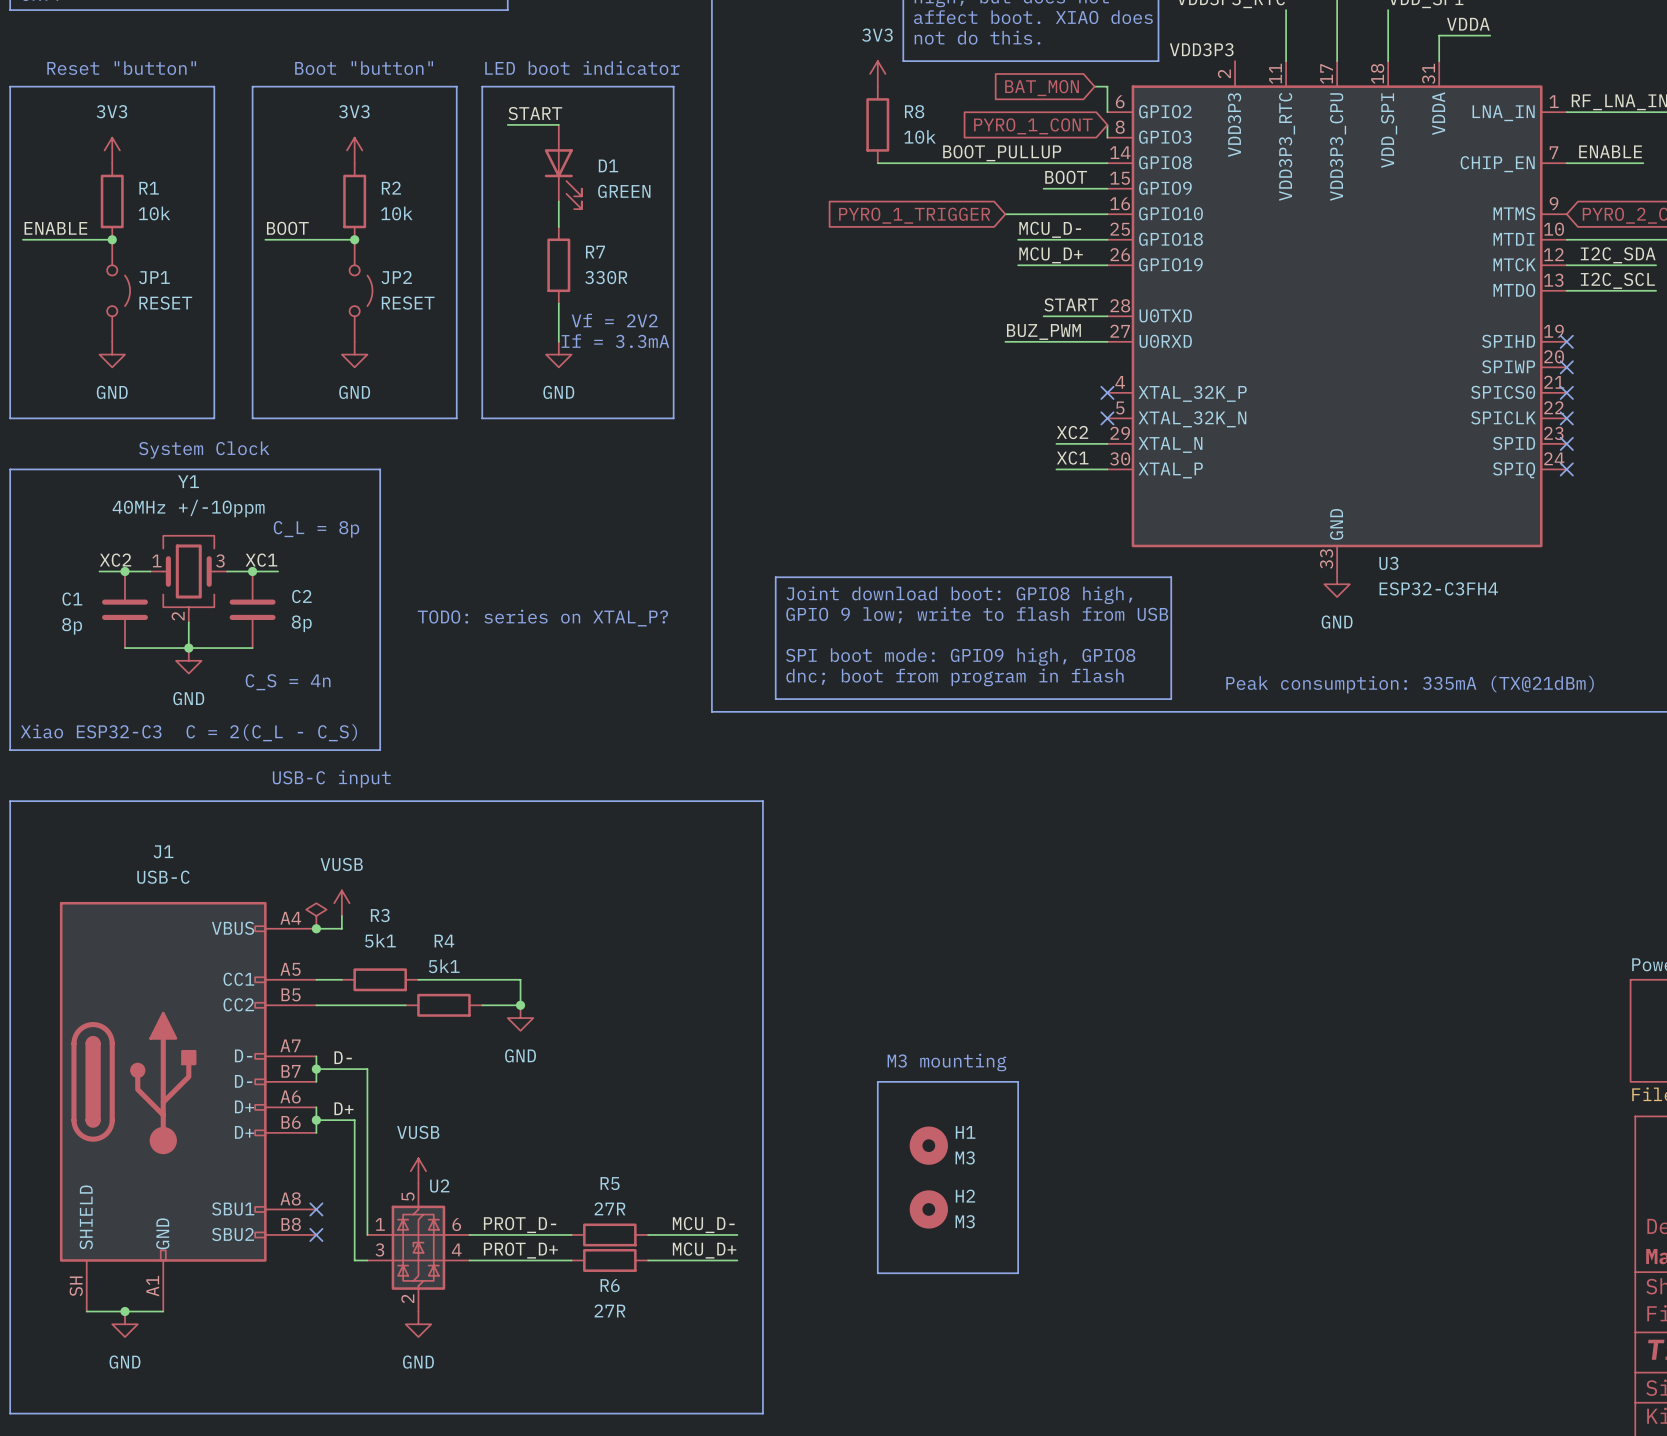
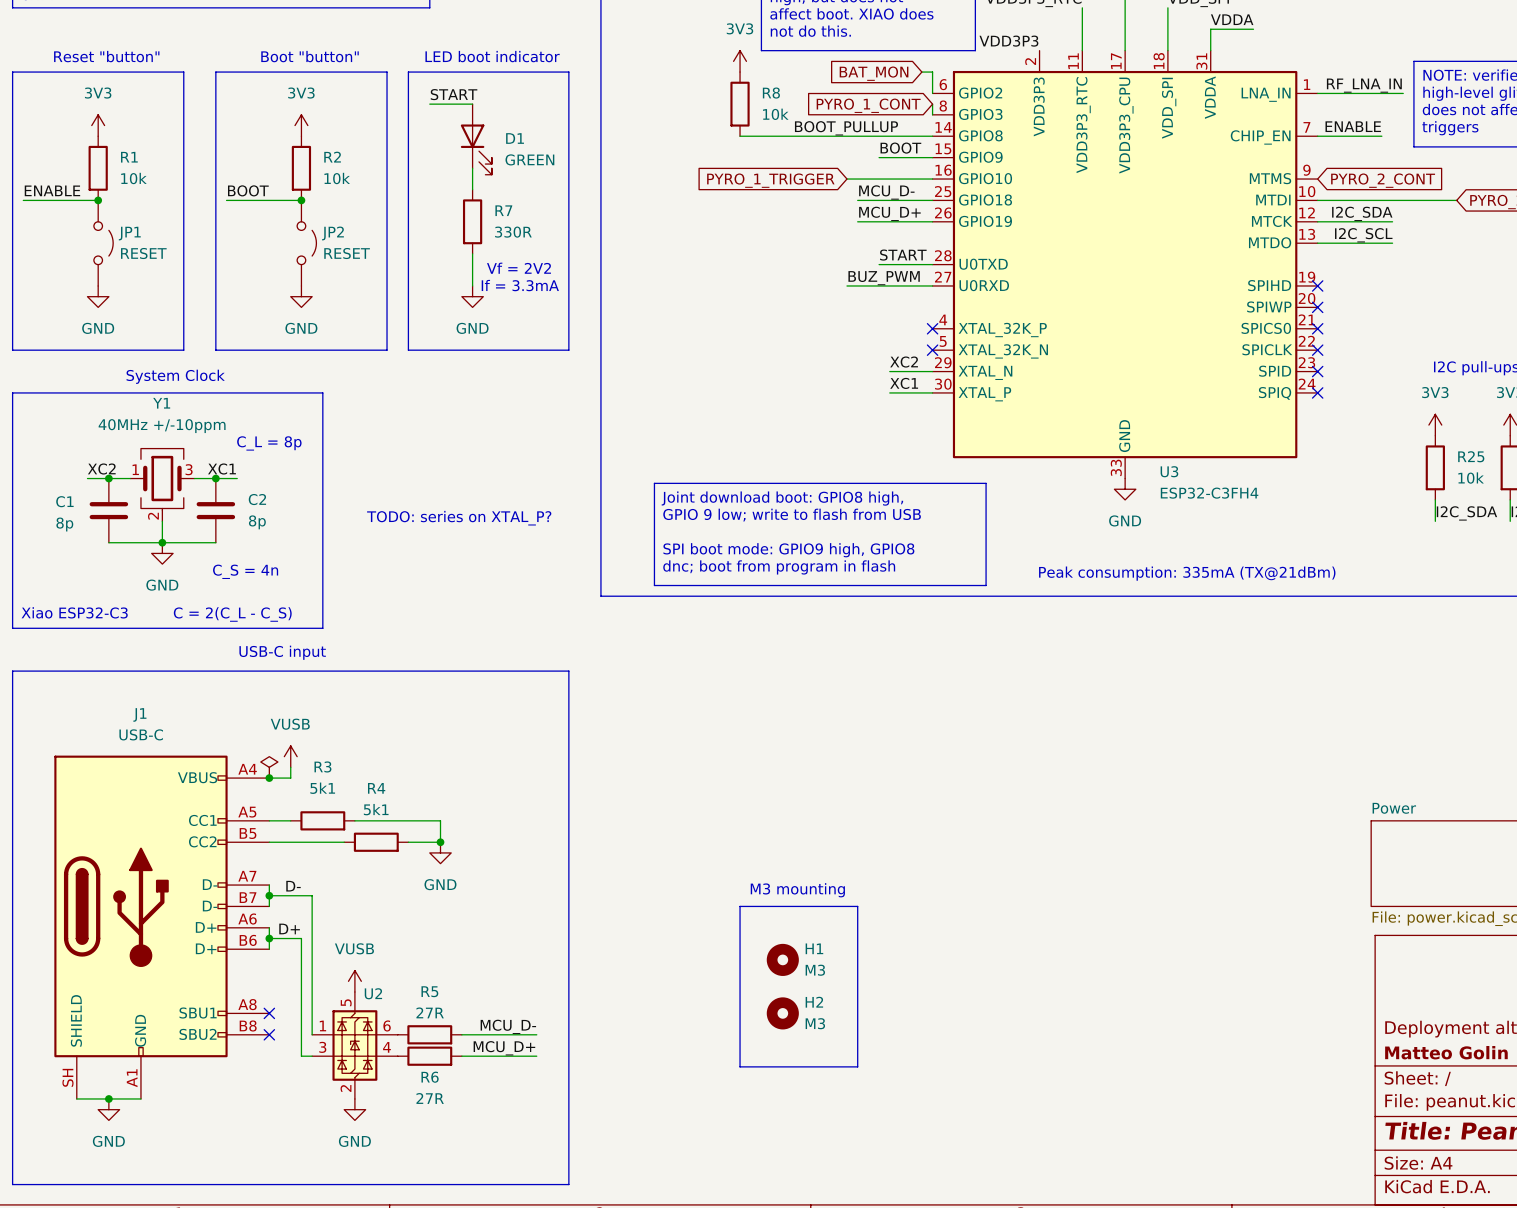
line: (673, 801) (762, 801) (762, 1413) (673, 1413) -> (568, 671) (568, 1184)
label: PROT_D- (520, 1225) -> none
label position: MCU_D- (703, 1225) -> MCU_D- (508, 1026)
wire: (469, 1234) (546, 1234) -> none
wire: none -> (483, 1034) (536, 1034)
R5 position: (609, 1234) -> (429, 1034)
wire: (648, 1234) (737, 1234) -> none
label: PROT_D+ (520, 1250) -> none
label position: MCU_D+ (704, 1250) -> MCU_D+ (504, 1048)
wire: (469, 1260) (546, 1260) -> none
wire: none -> (483, 1056) (536, 1056)
R6 position: (609, 1260) -> (429, 1056)
wire: (648, 1260) (737, 1260) -> none

